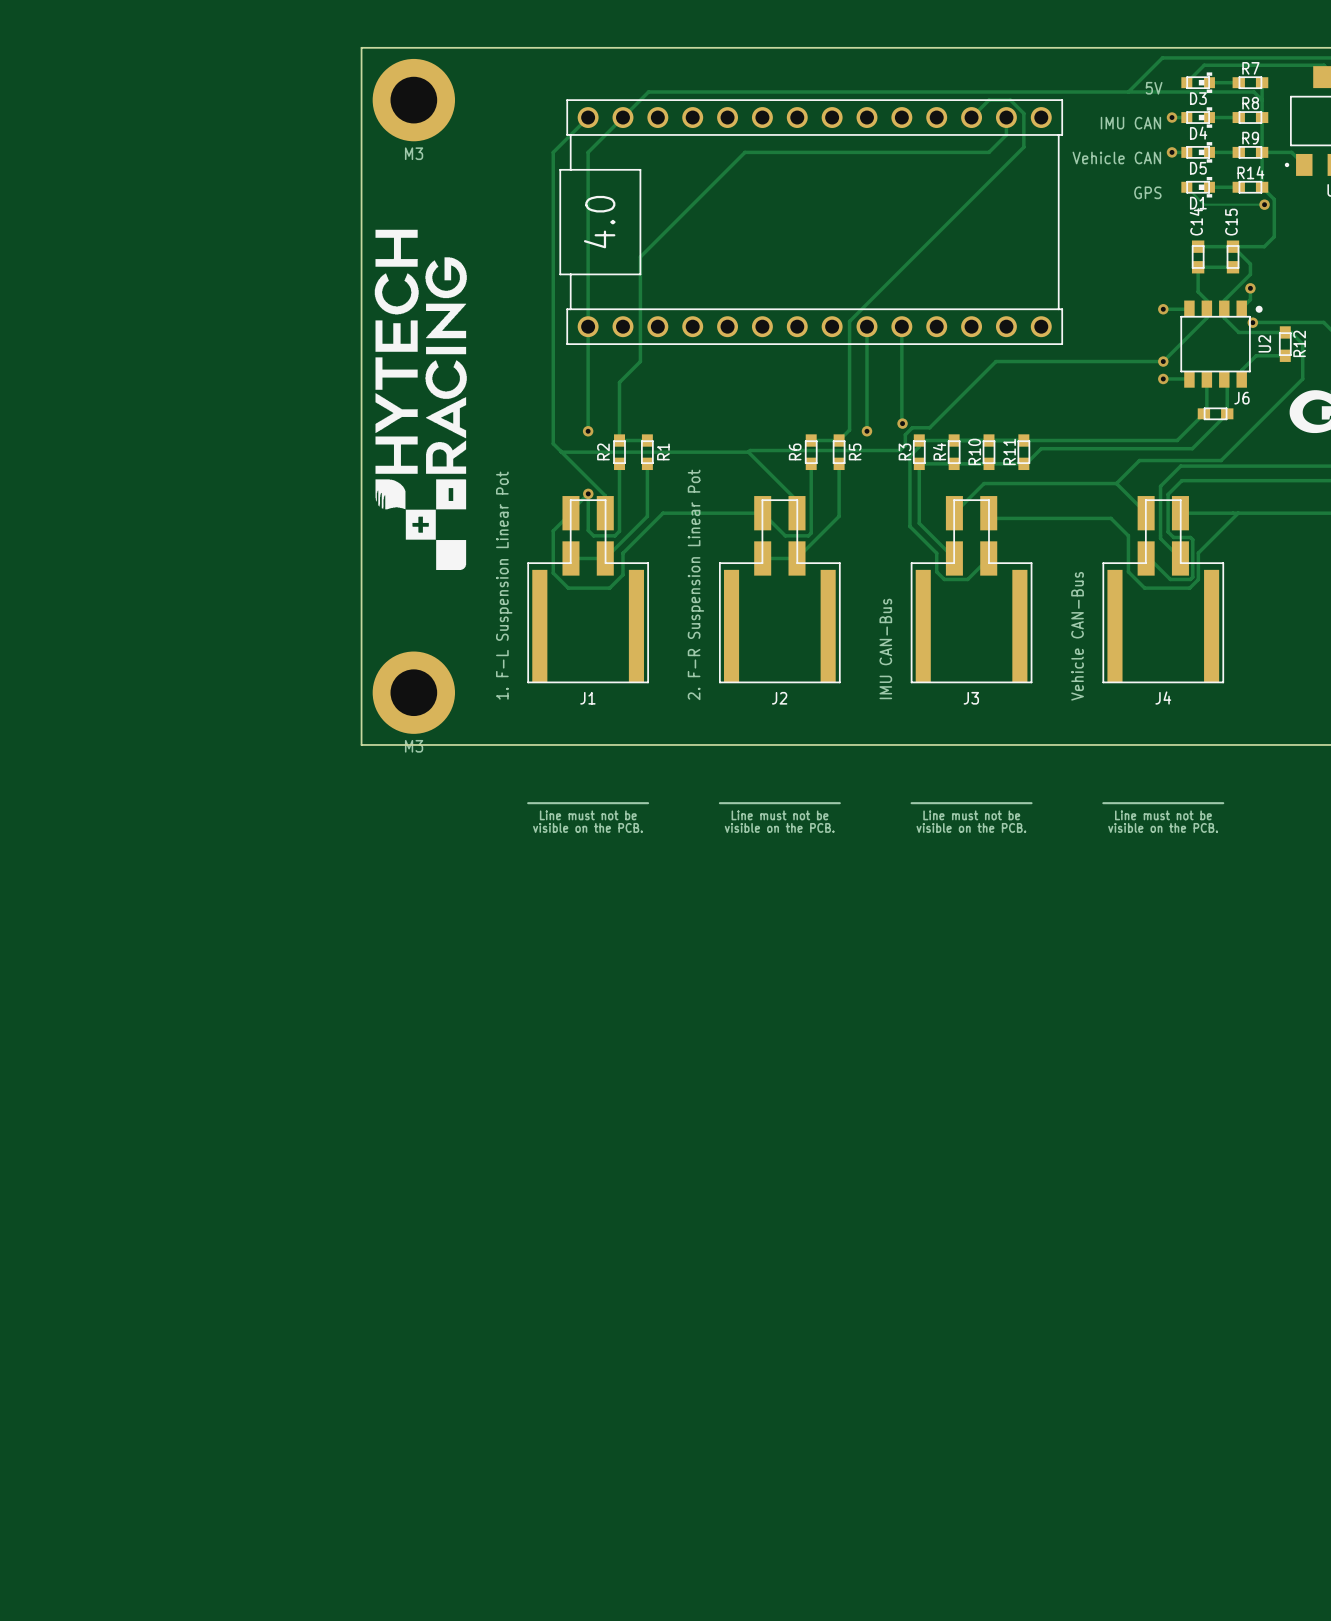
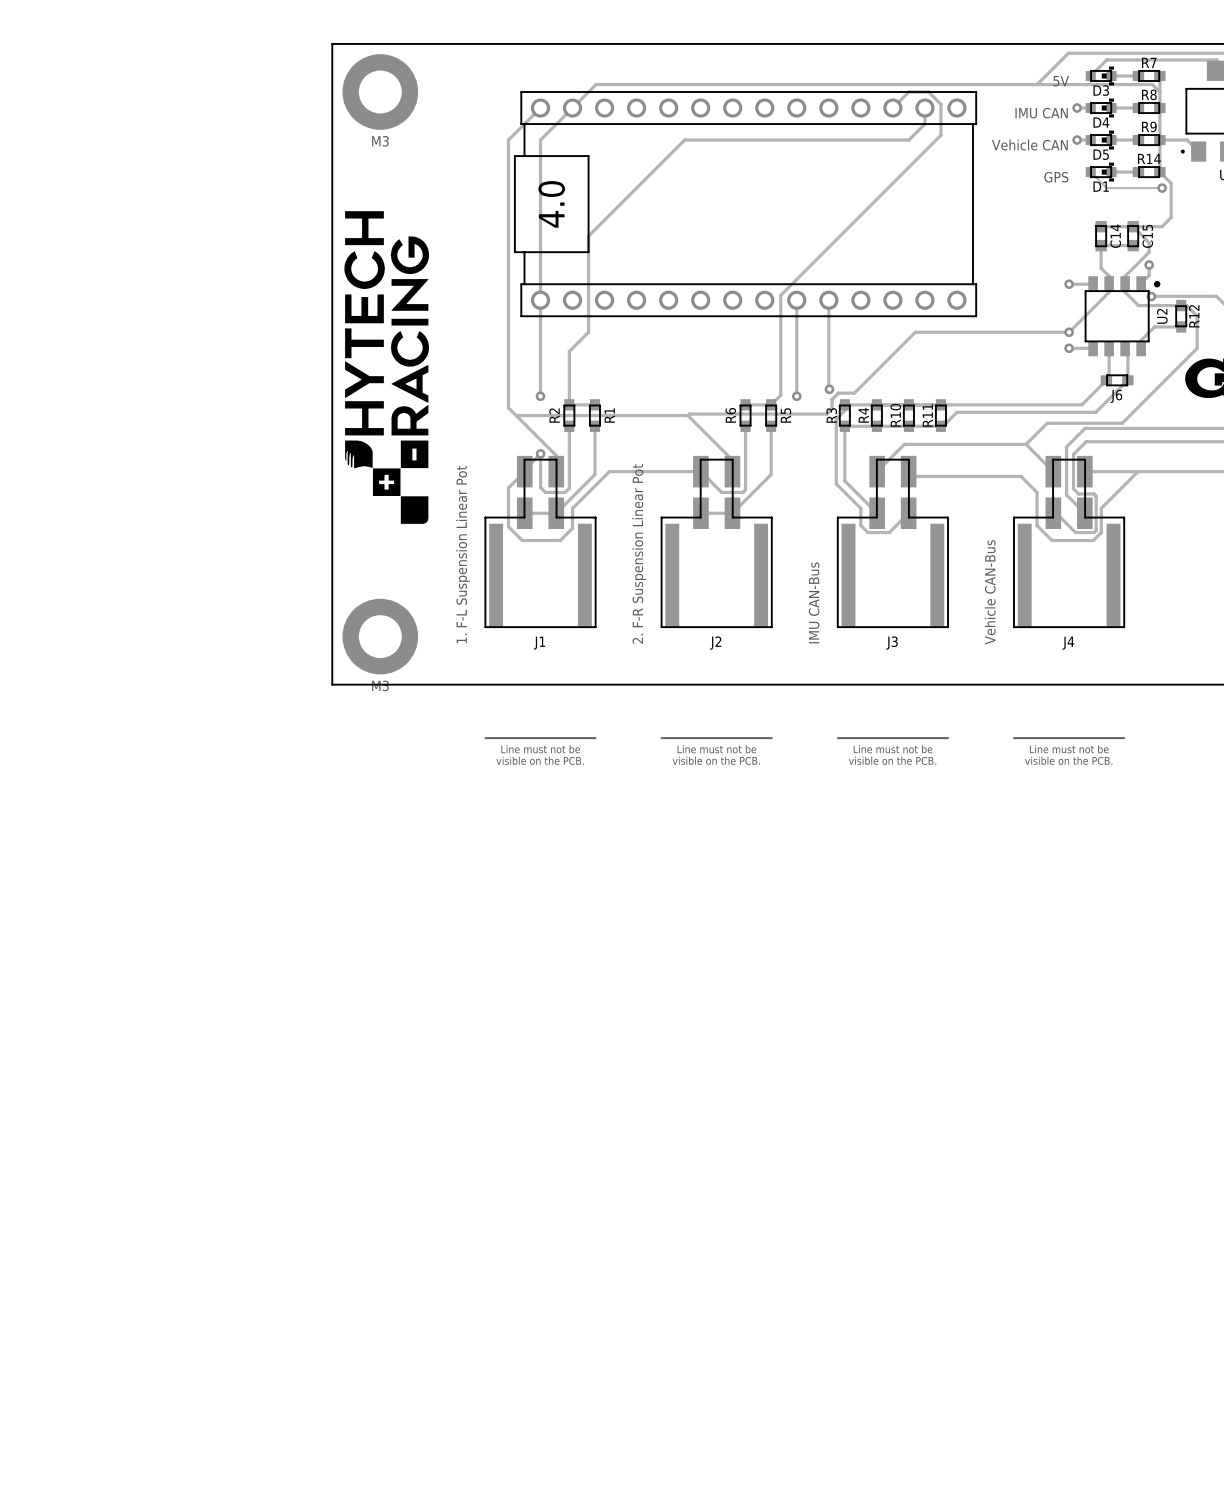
C14 name position: C14 (1196, 221) -> C14 (1115, 236)
C15 name position: C15 (1231, 222) -> C15 (1147, 236)
J6 name position: J6 (1241, 398) -> J6 (1116, 396)

